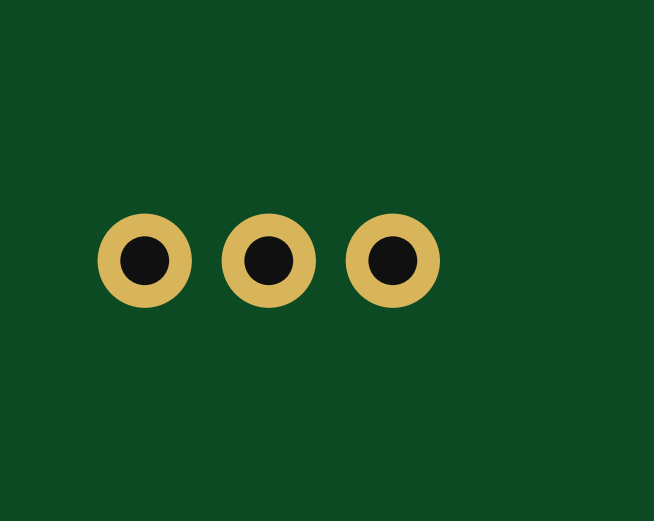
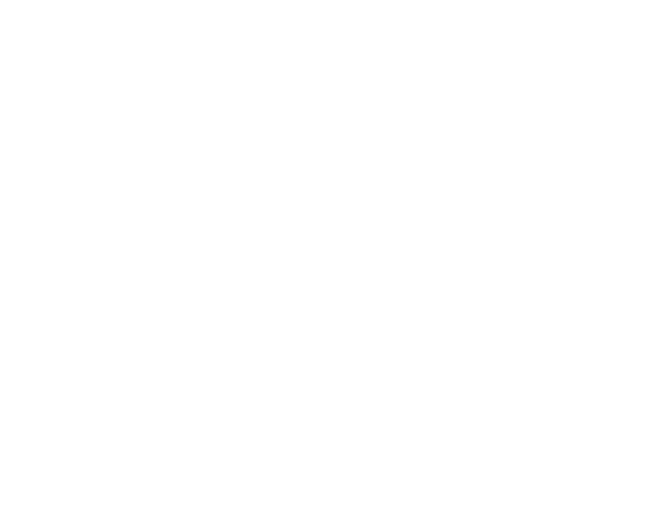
part: (268, 260) -> none

